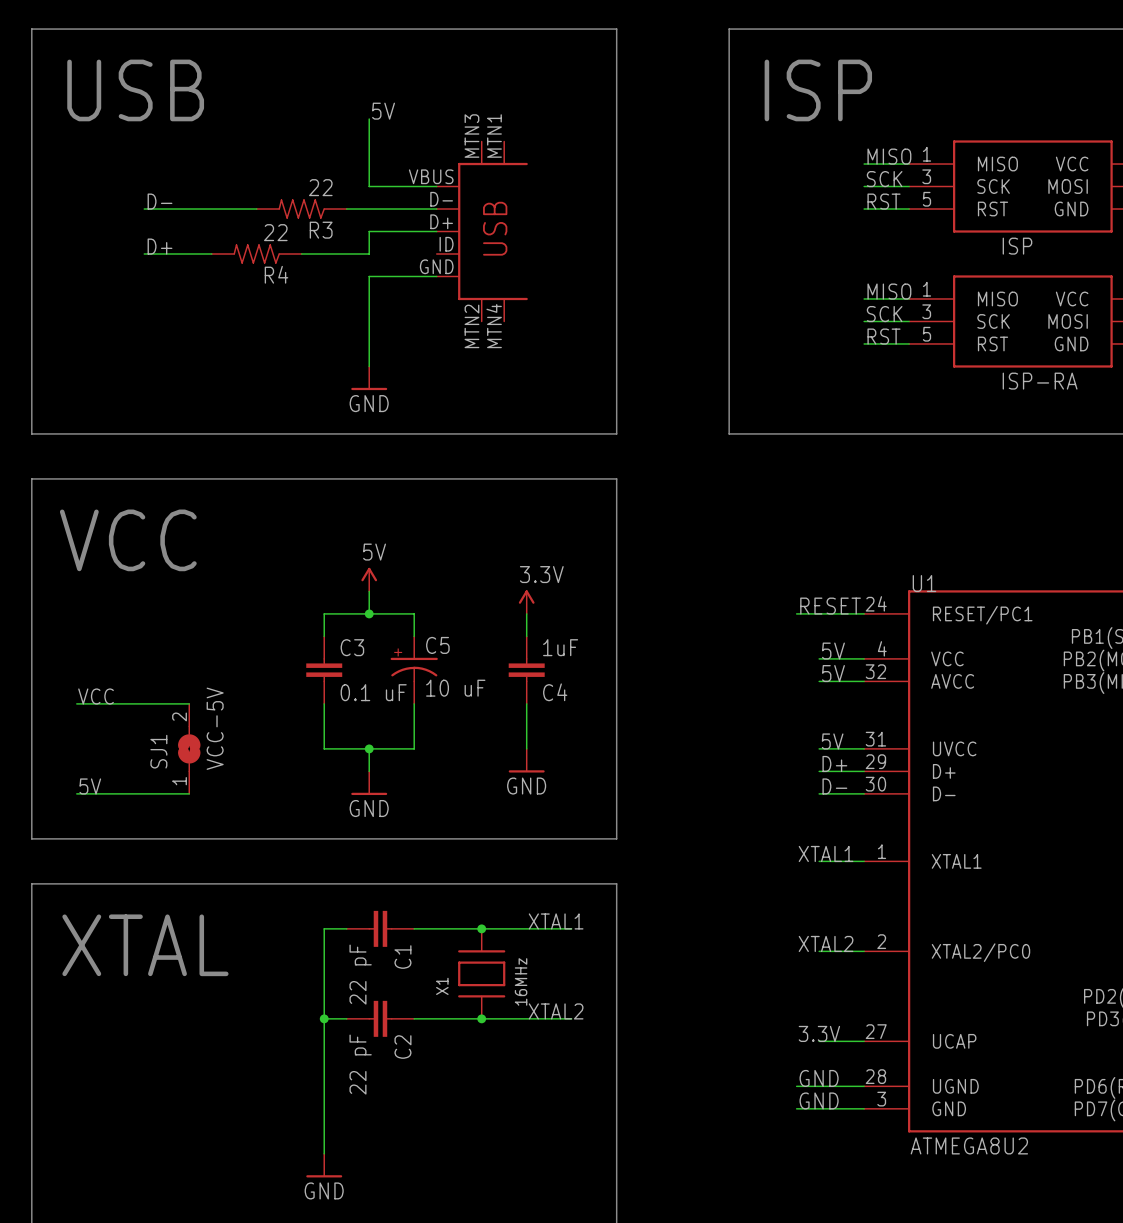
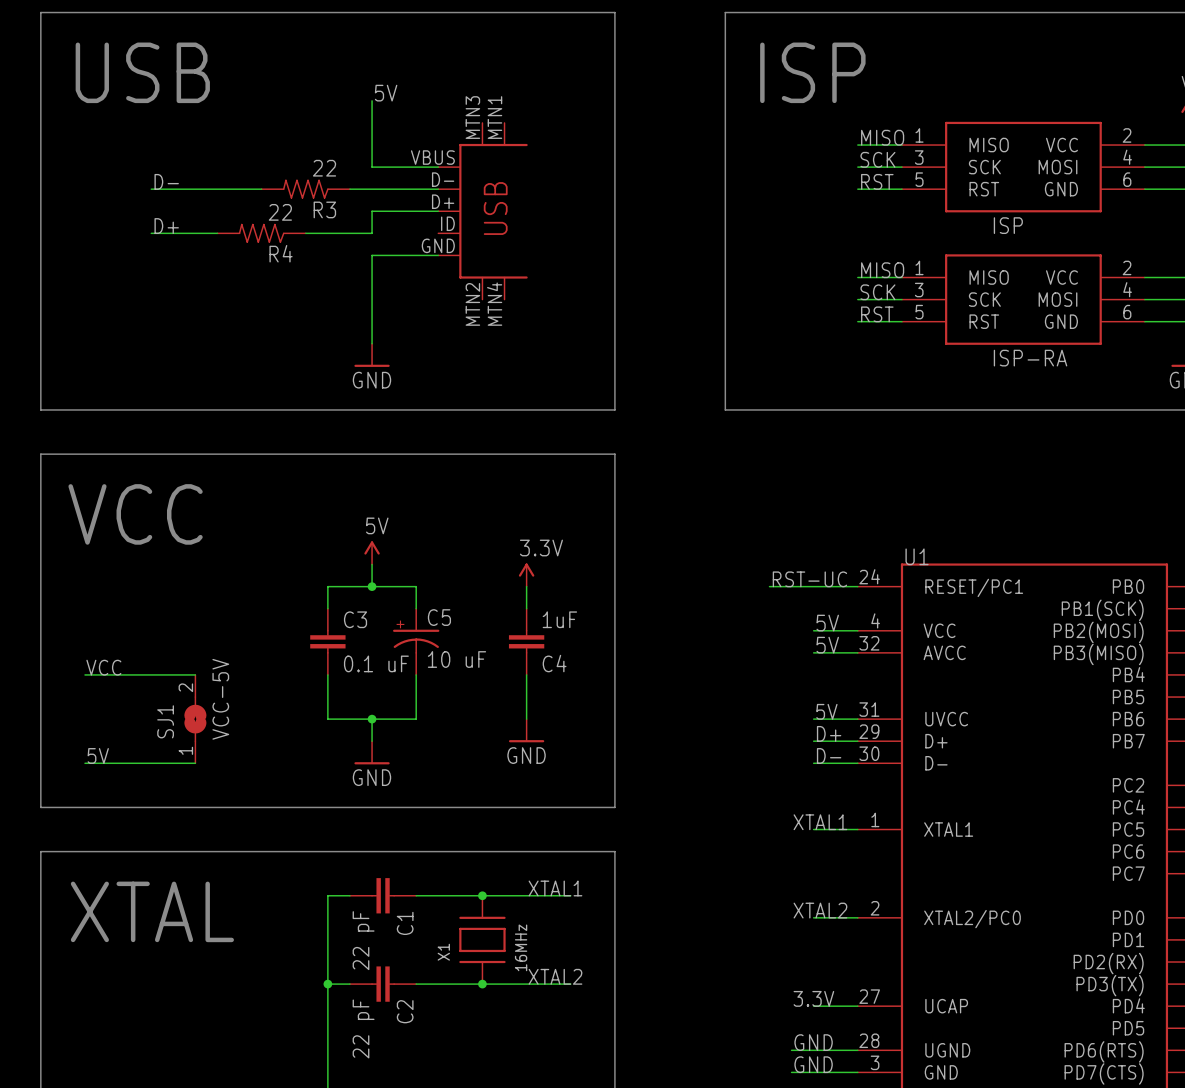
label: none -> RST-UC (809, 579)
label: RESET (830, 606) -> none
wire: none -> (769, 586) (791, 586)

